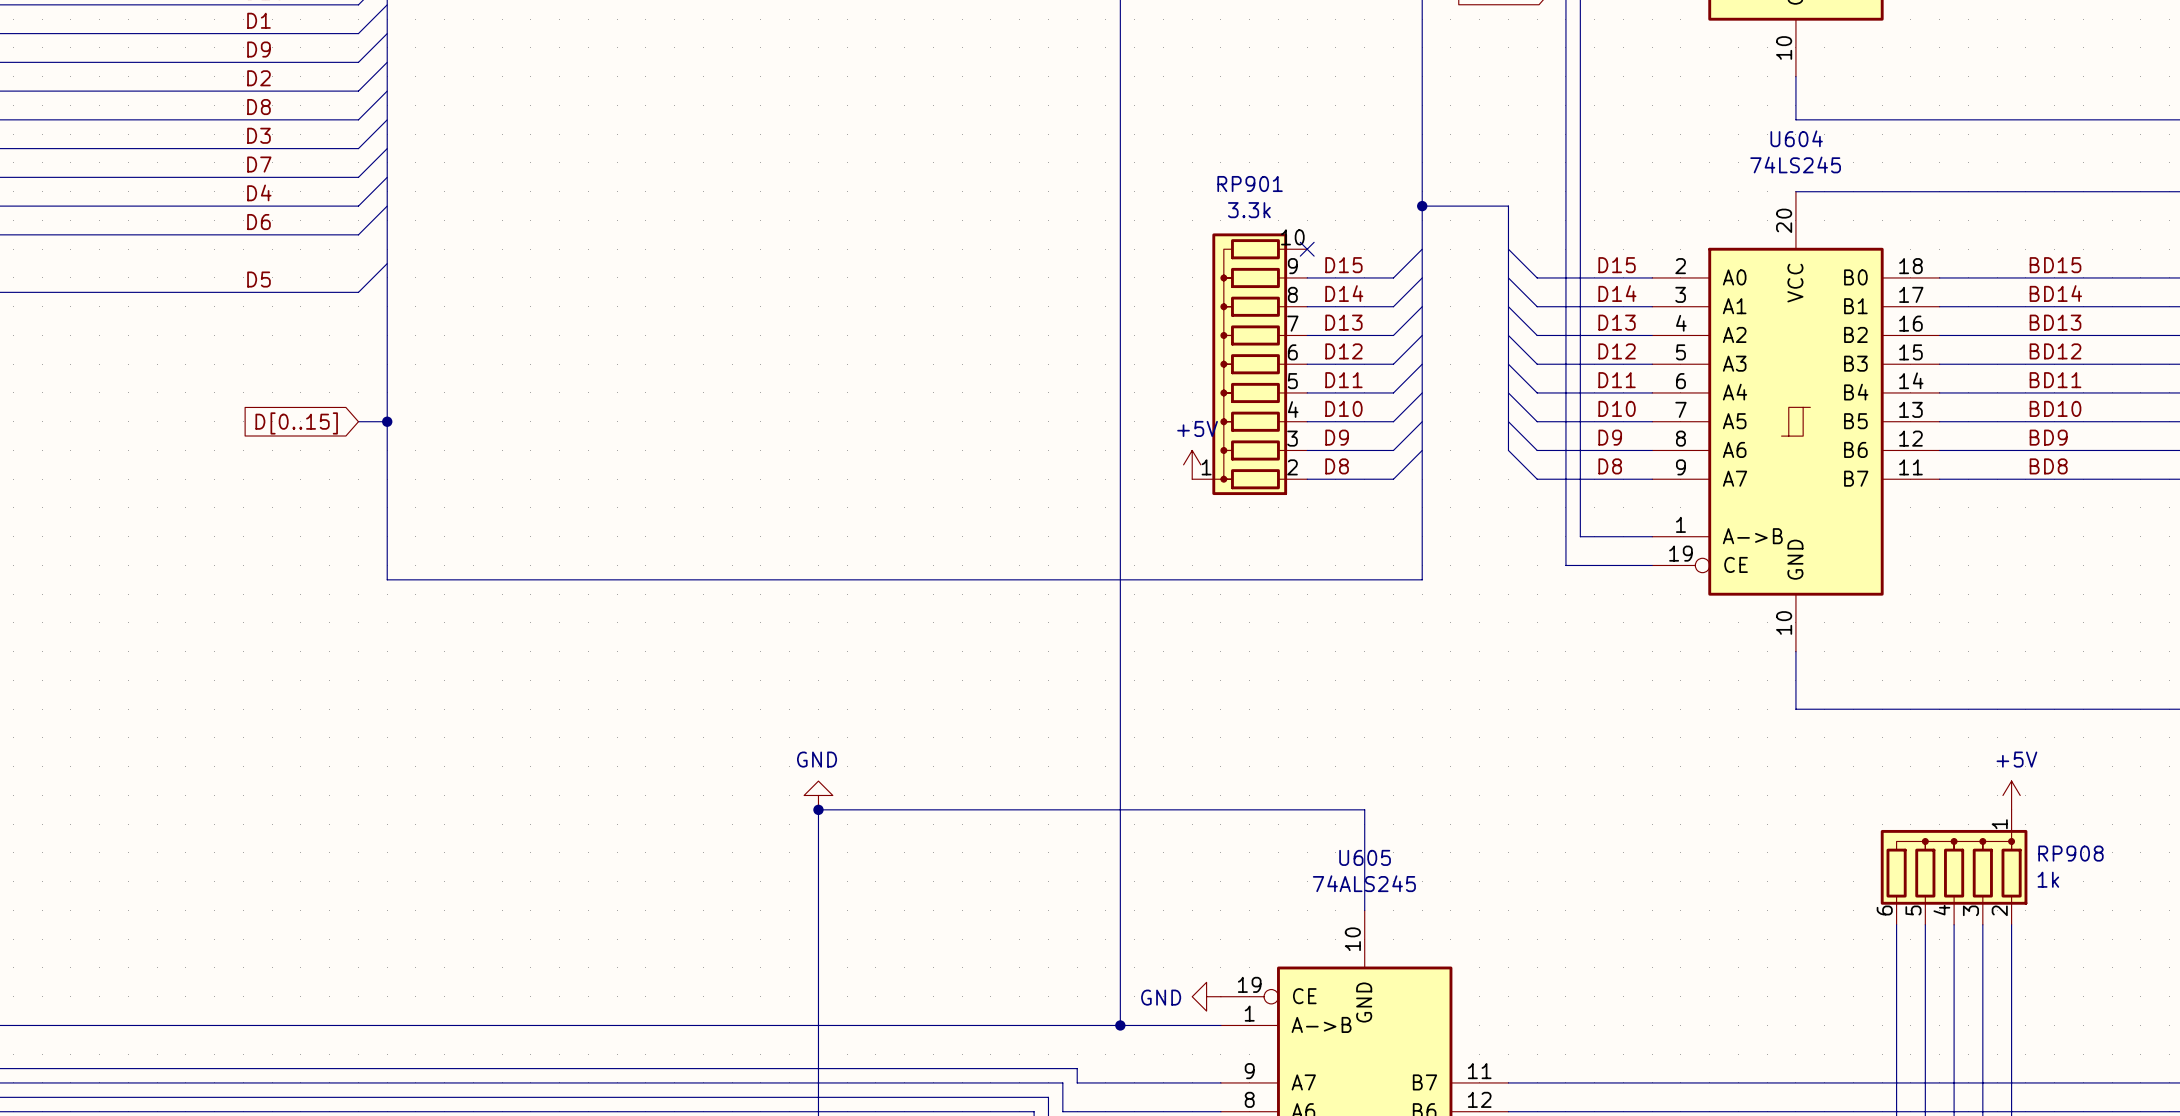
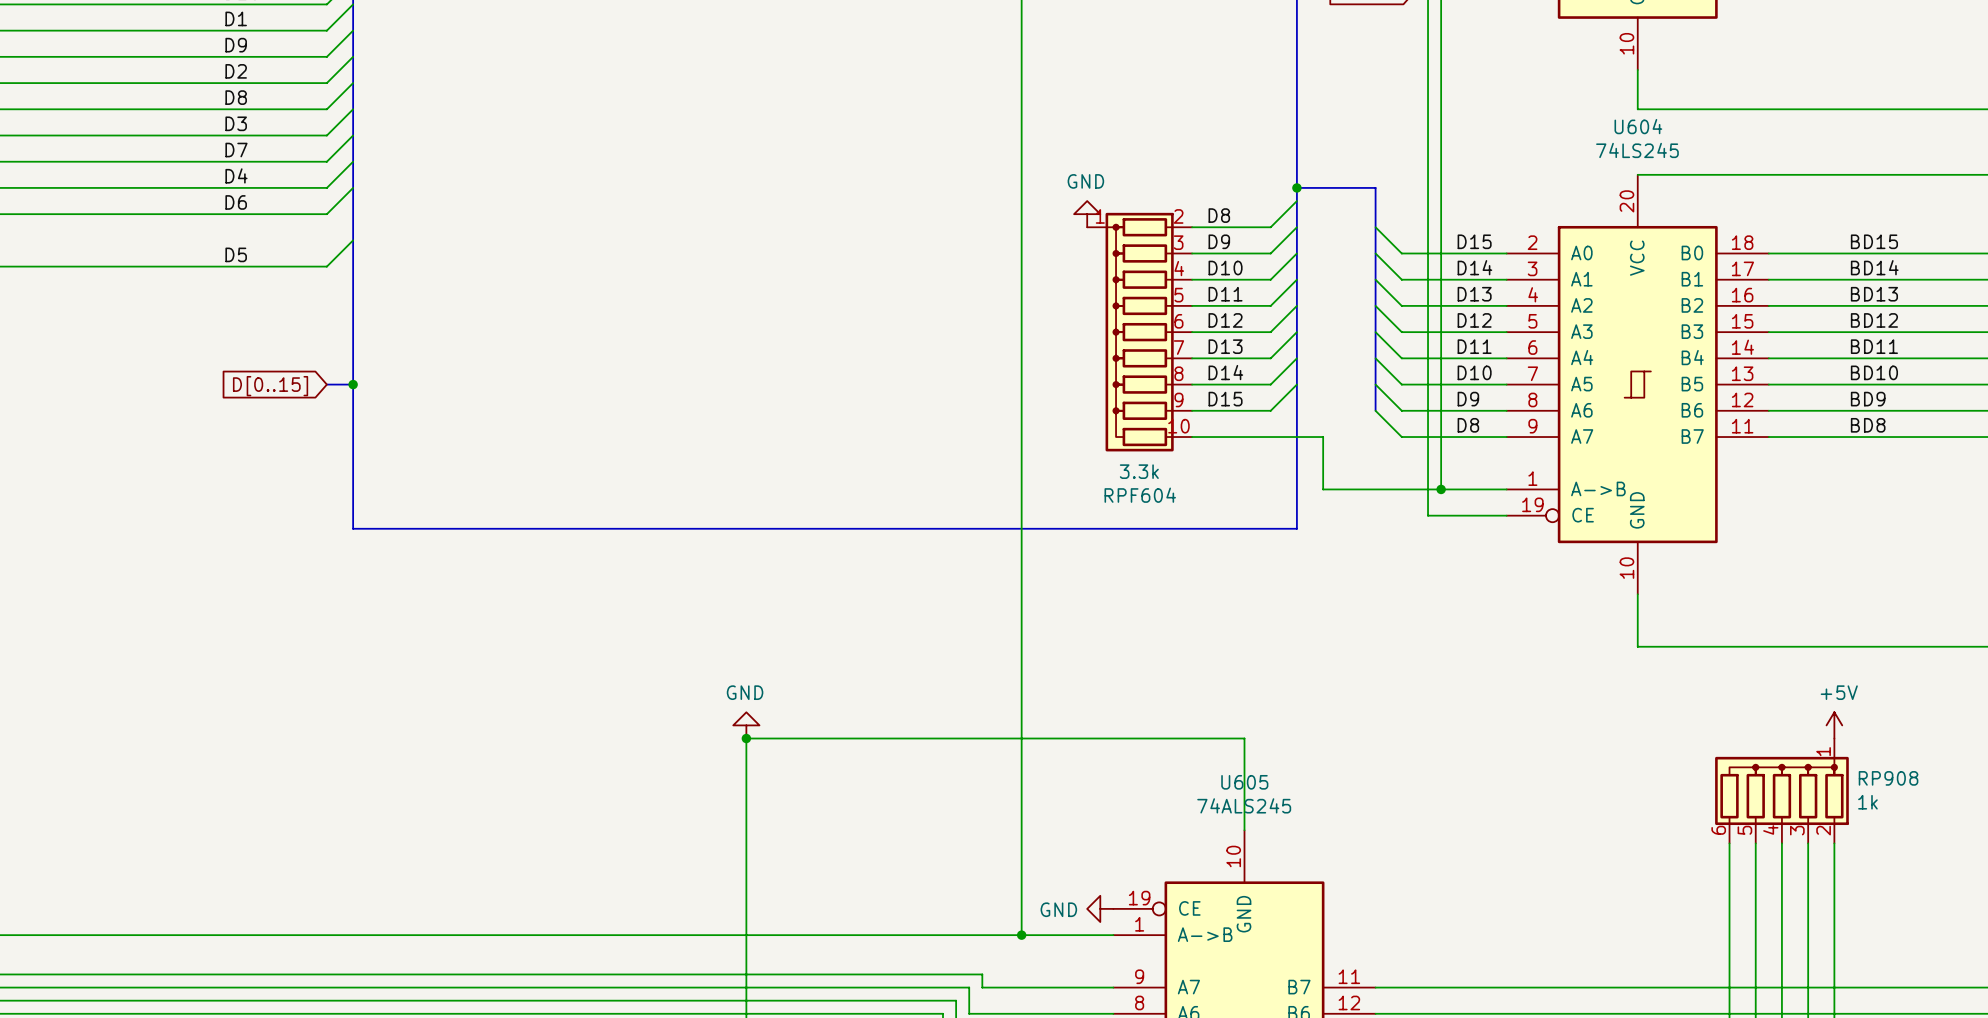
wire: none -> (1296, 201) (1270, 227) (1192, 227)
power symbol: none -> GND (1087, 214)
no-connect mark: (1307, 249) -> none
label: D15 (1343, 265) -> D9 (1219, 241)
label: D14 (1344, 293) -> D10 (1225, 268)
label: D13 (1343, 322) -> D11 (1225, 294)
RP901: 3.3k (1249, 364) -> none
RPF604: none -> 3.3k (1139, 332)
label: D11 (1343, 380) -> D13 (1225, 346)
label: D10 (1343, 408) -> D14 (1225, 372)
label: D9 (1337, 437) -> D15 (1225, 399)
wire: (1422, 450) (1393, 479) -> (1441, 489) (1323, 489) (1323, 437) (1270, 437)
power symbol: +5V (1192, 464) -> none
label position: D8 (1337, 466) -> D8 (1219, 215)
junction: none -> (1441, 489)

